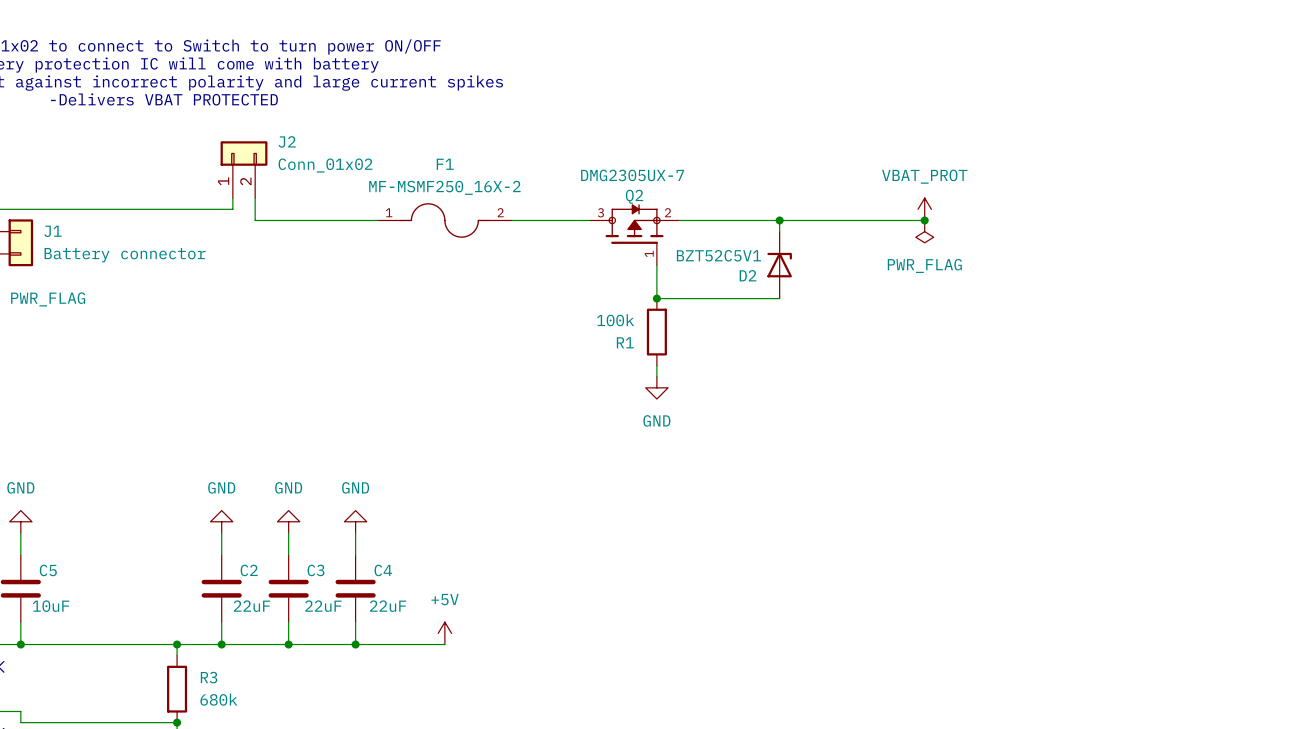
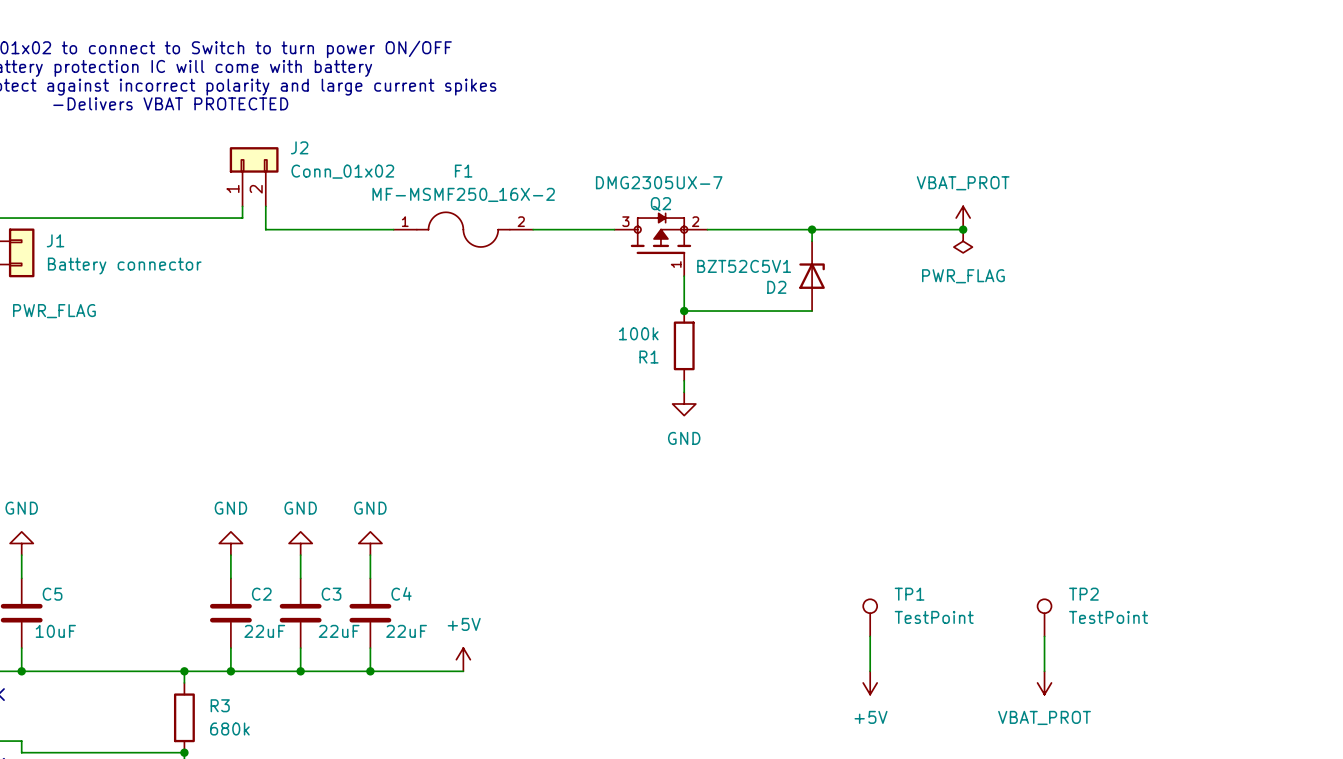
TP1: none -> TestPoint (870, 617)
TP2: none -> TestPoint (1044, 617)
wire: none -> (870, 636) (870, 671)
wire: none -> (1044, 636) (1044, 671)
power symbol: none -> +5V (870, 682)
power symbol: none -> VBAT_PROT (1044, 682)

